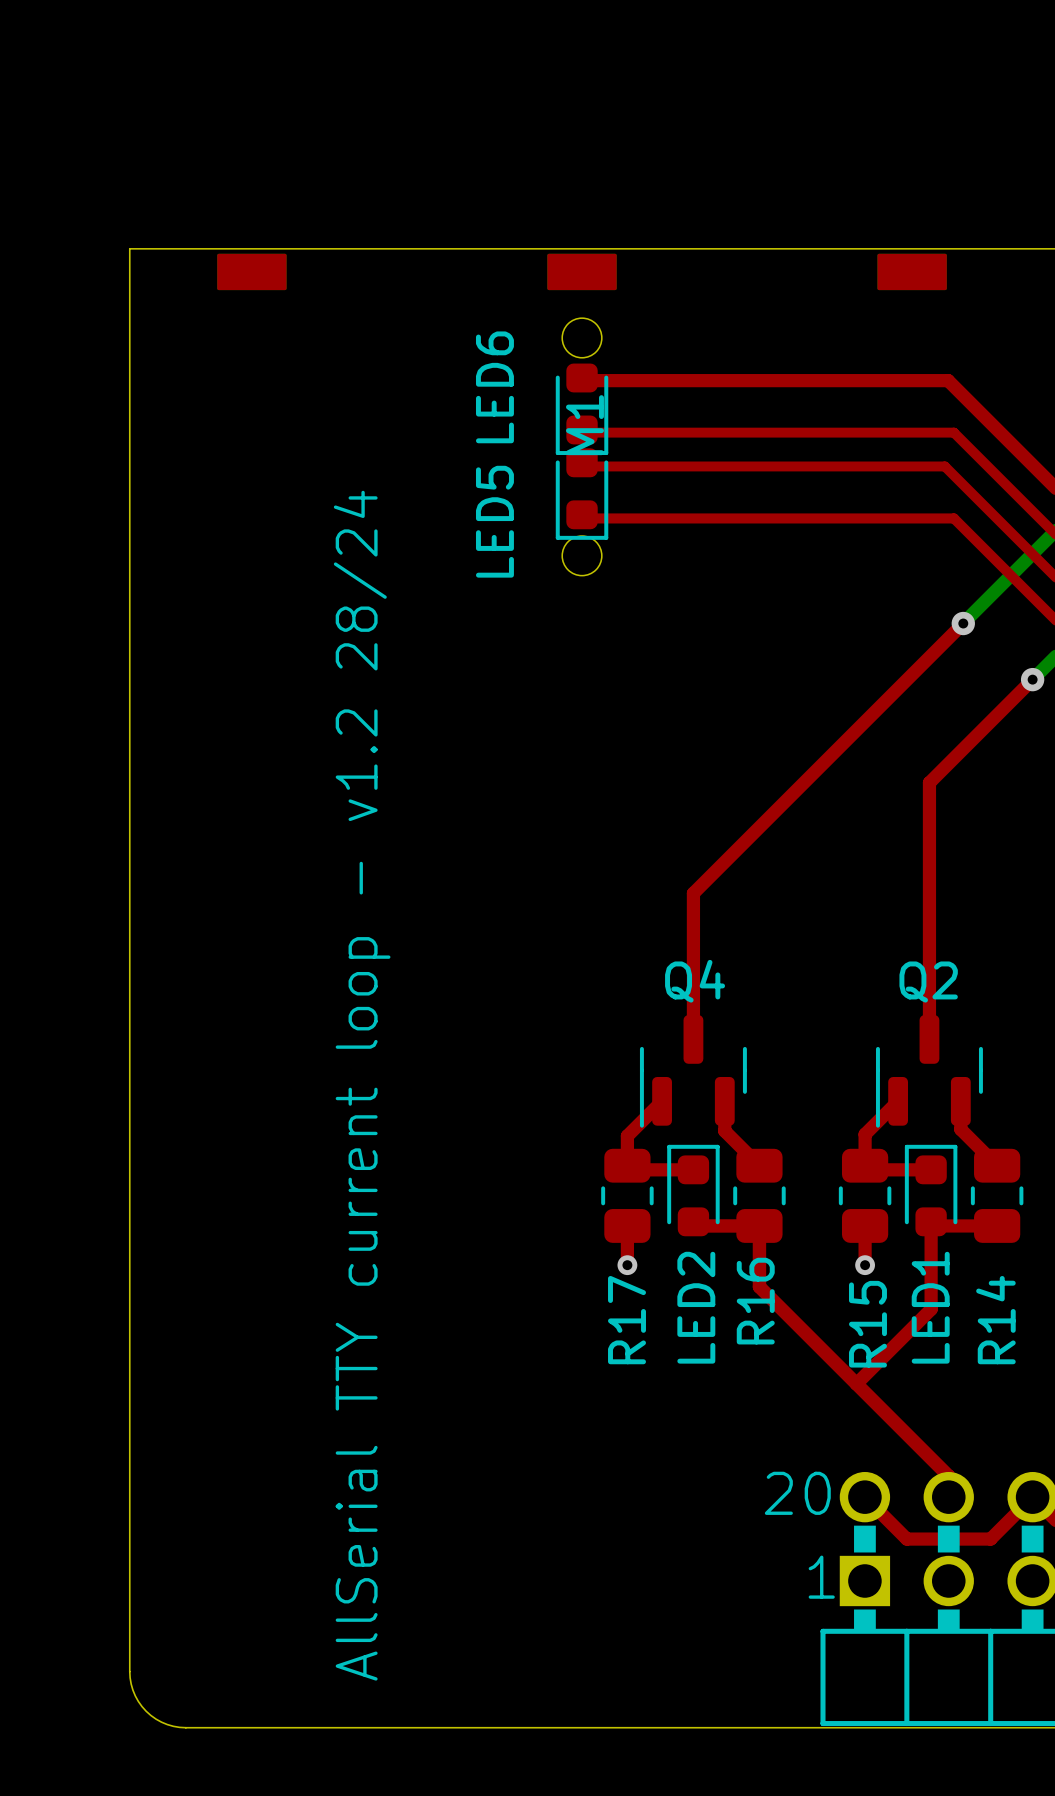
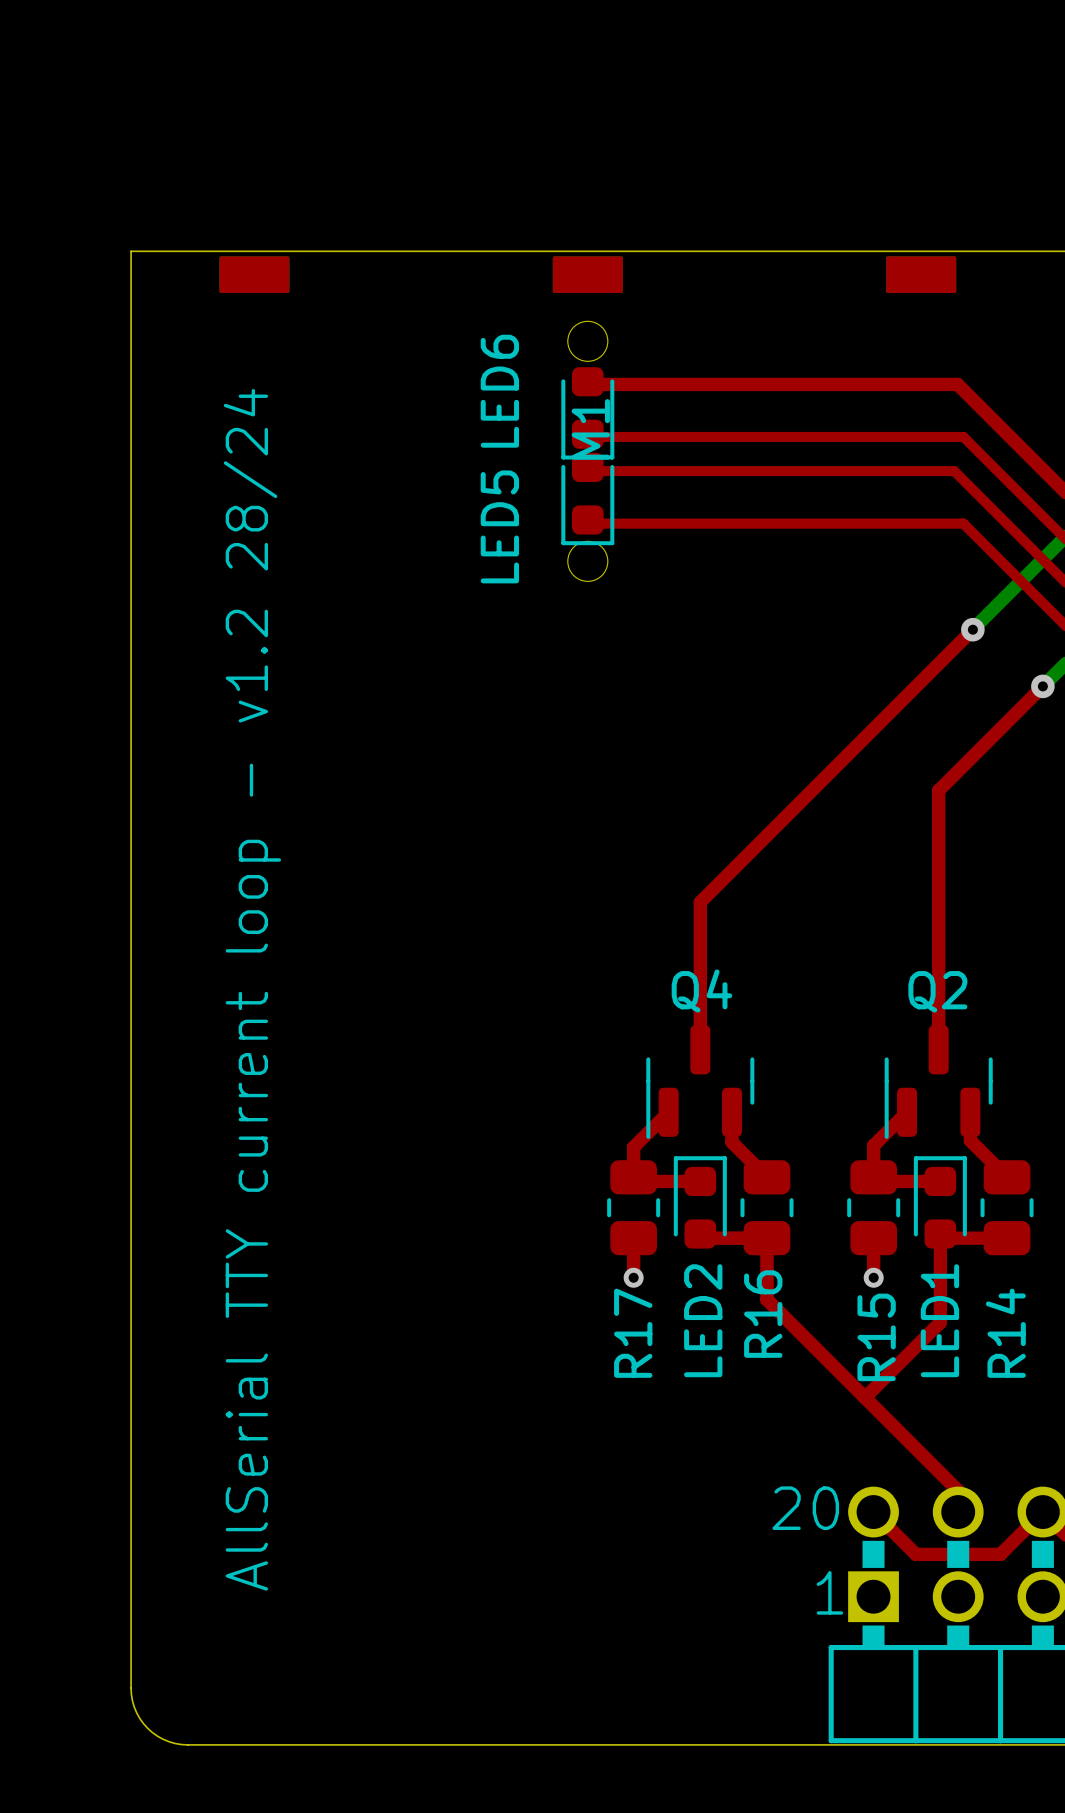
text position: AllSerial TTY current loop - v1.2 28/24 (362, 1085) -> AllSerial TTY current loop - v1.2 28/24 (252, 989)

